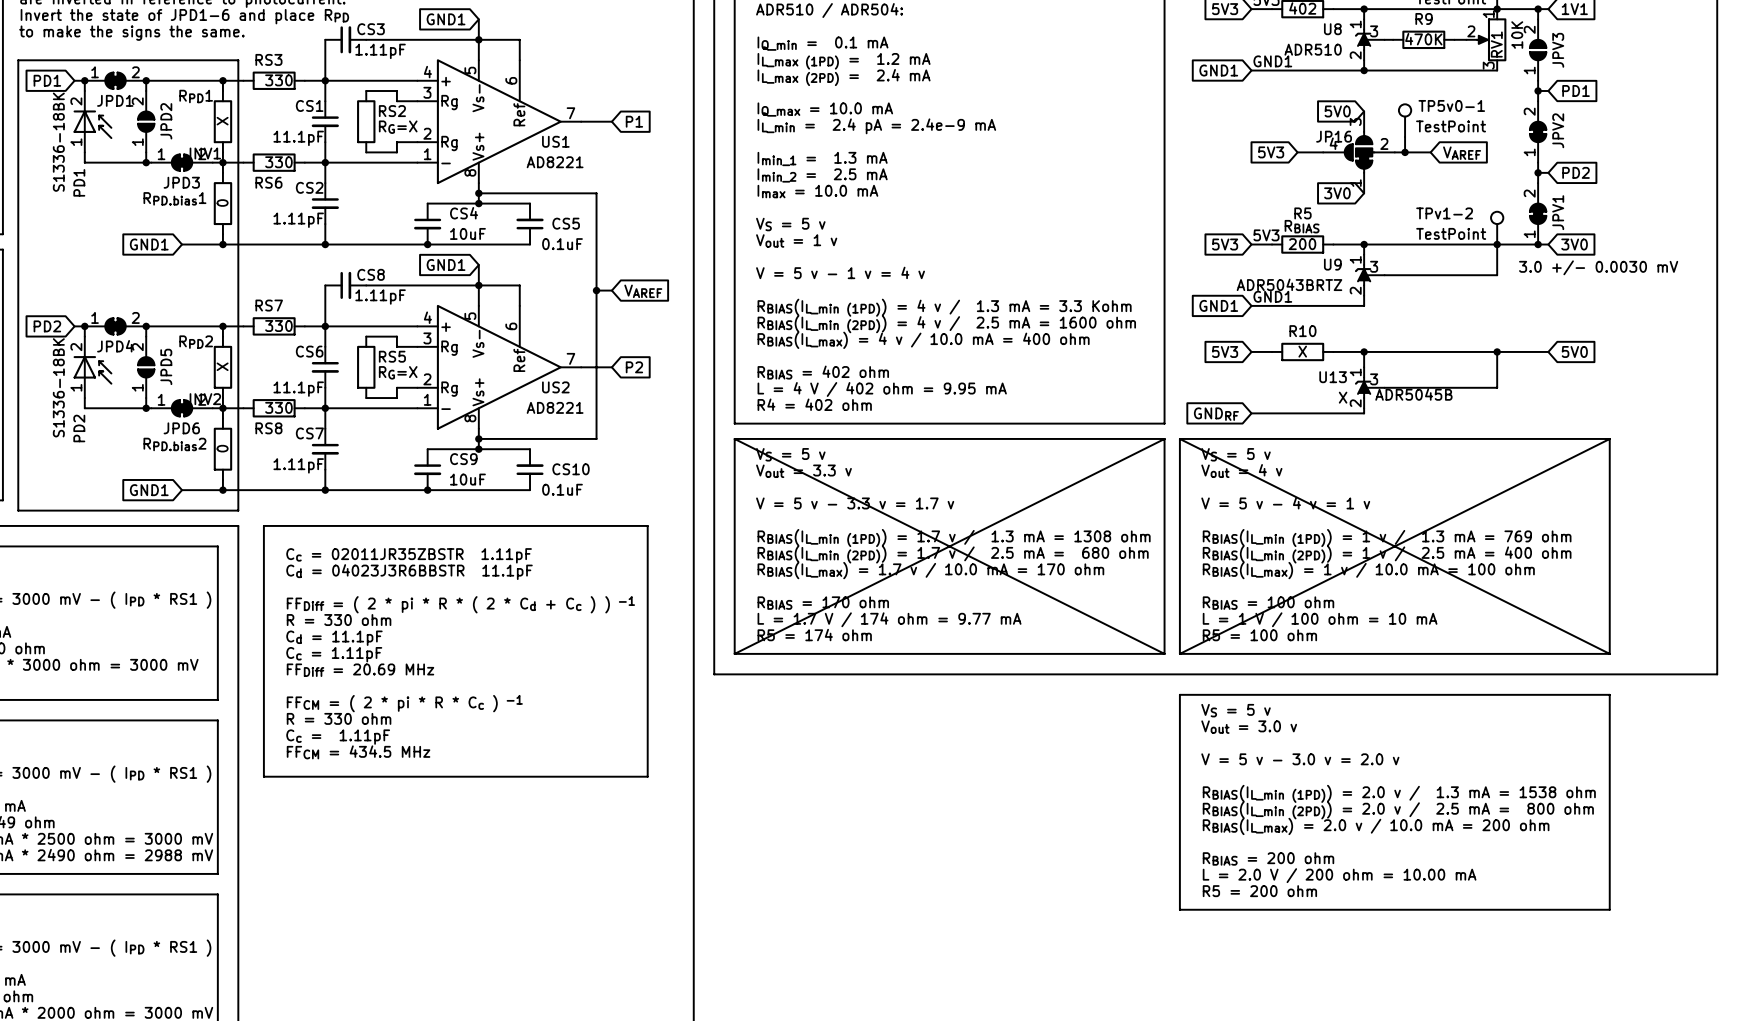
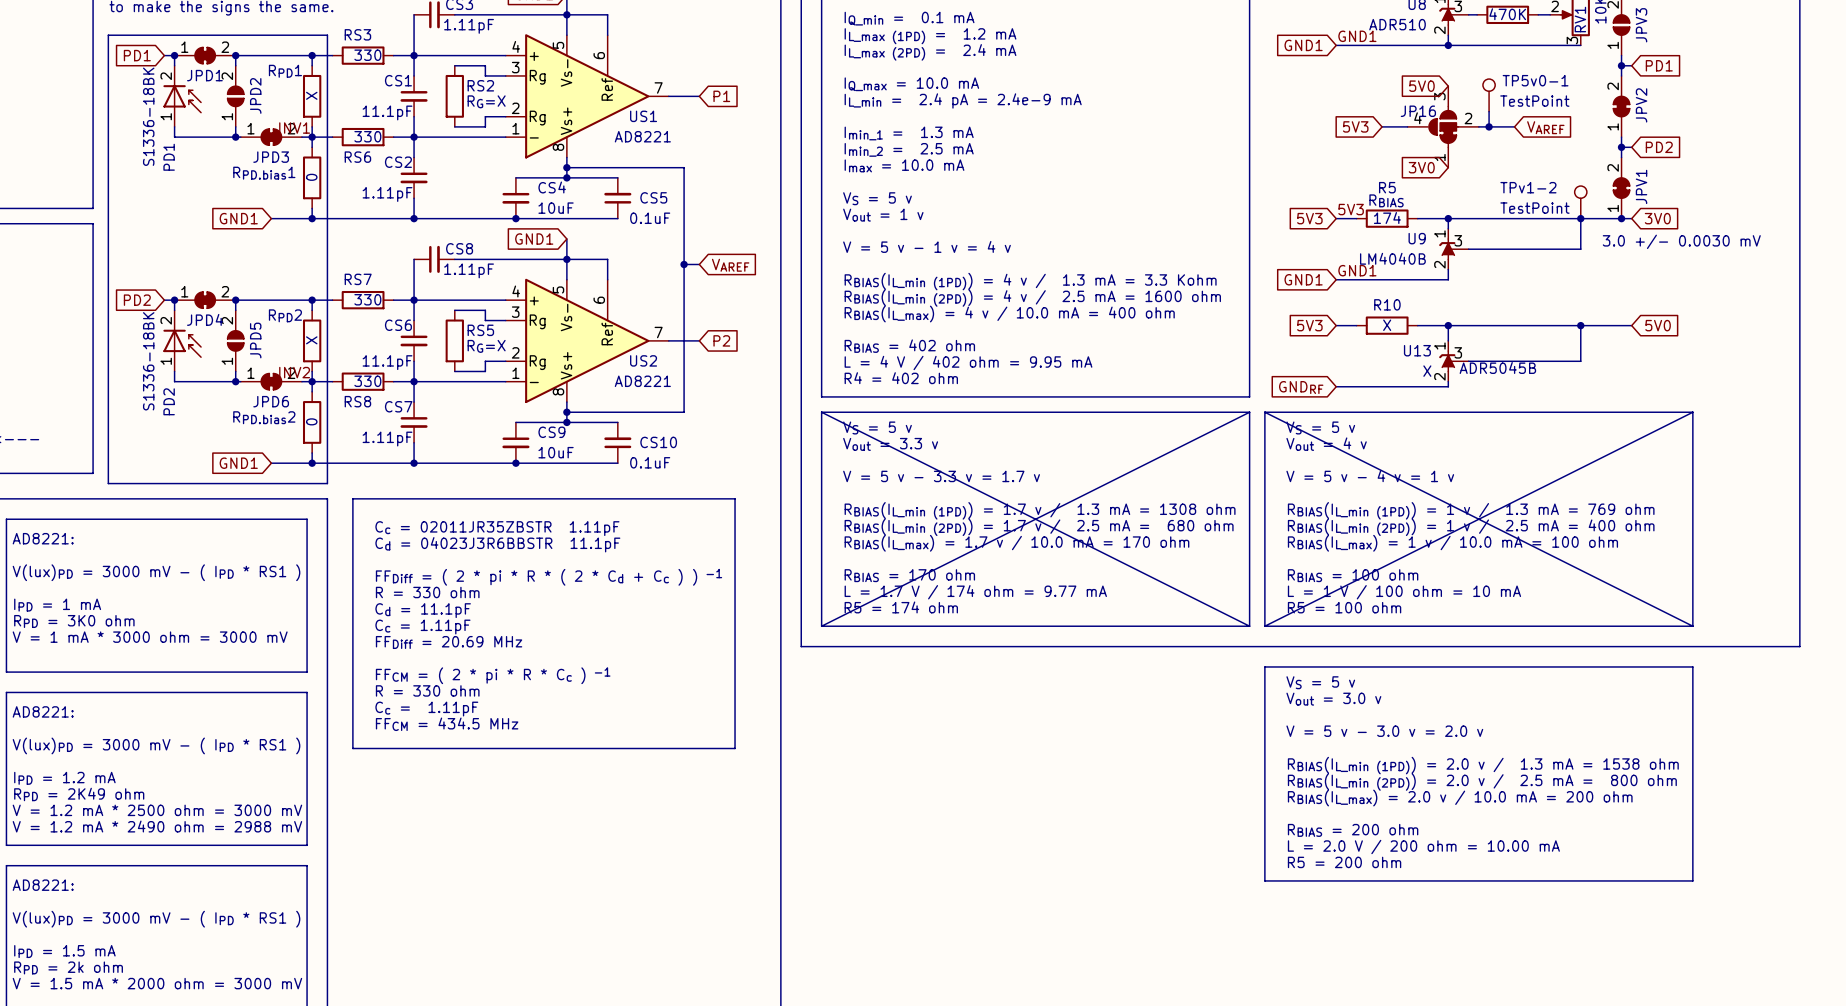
R5 value: 200 (1302, 244) -> 174 (1387, 218)
U9 value: ADR5043BRTZ (1289, 284) -> LM4040B (1392, 258)

